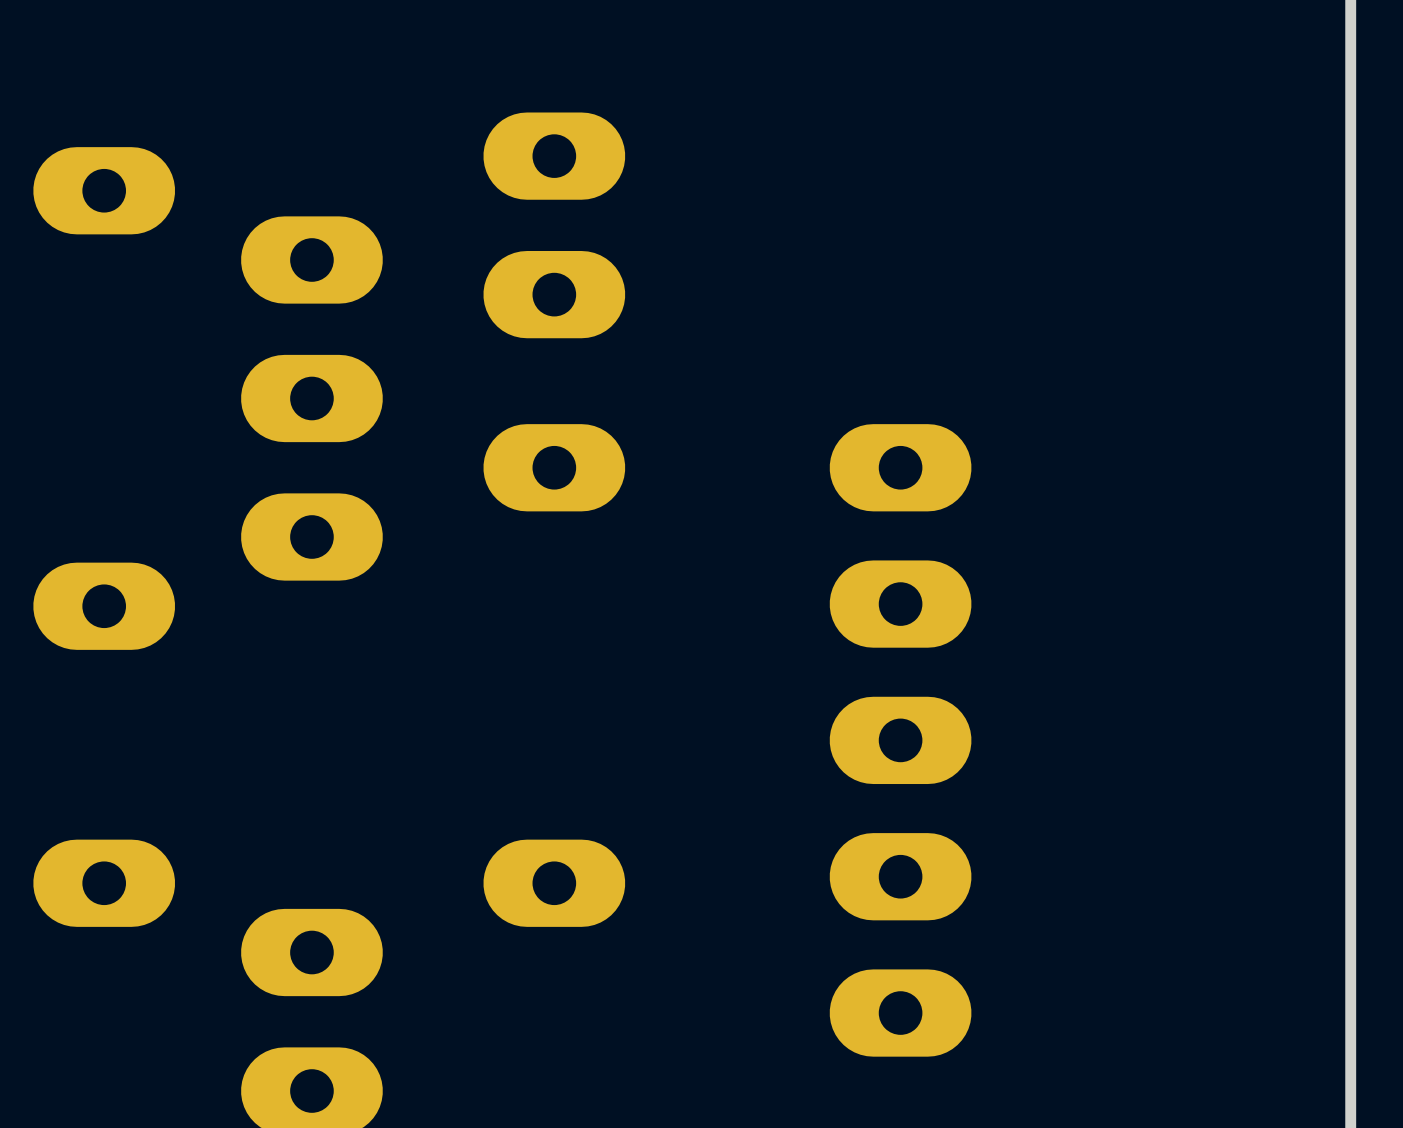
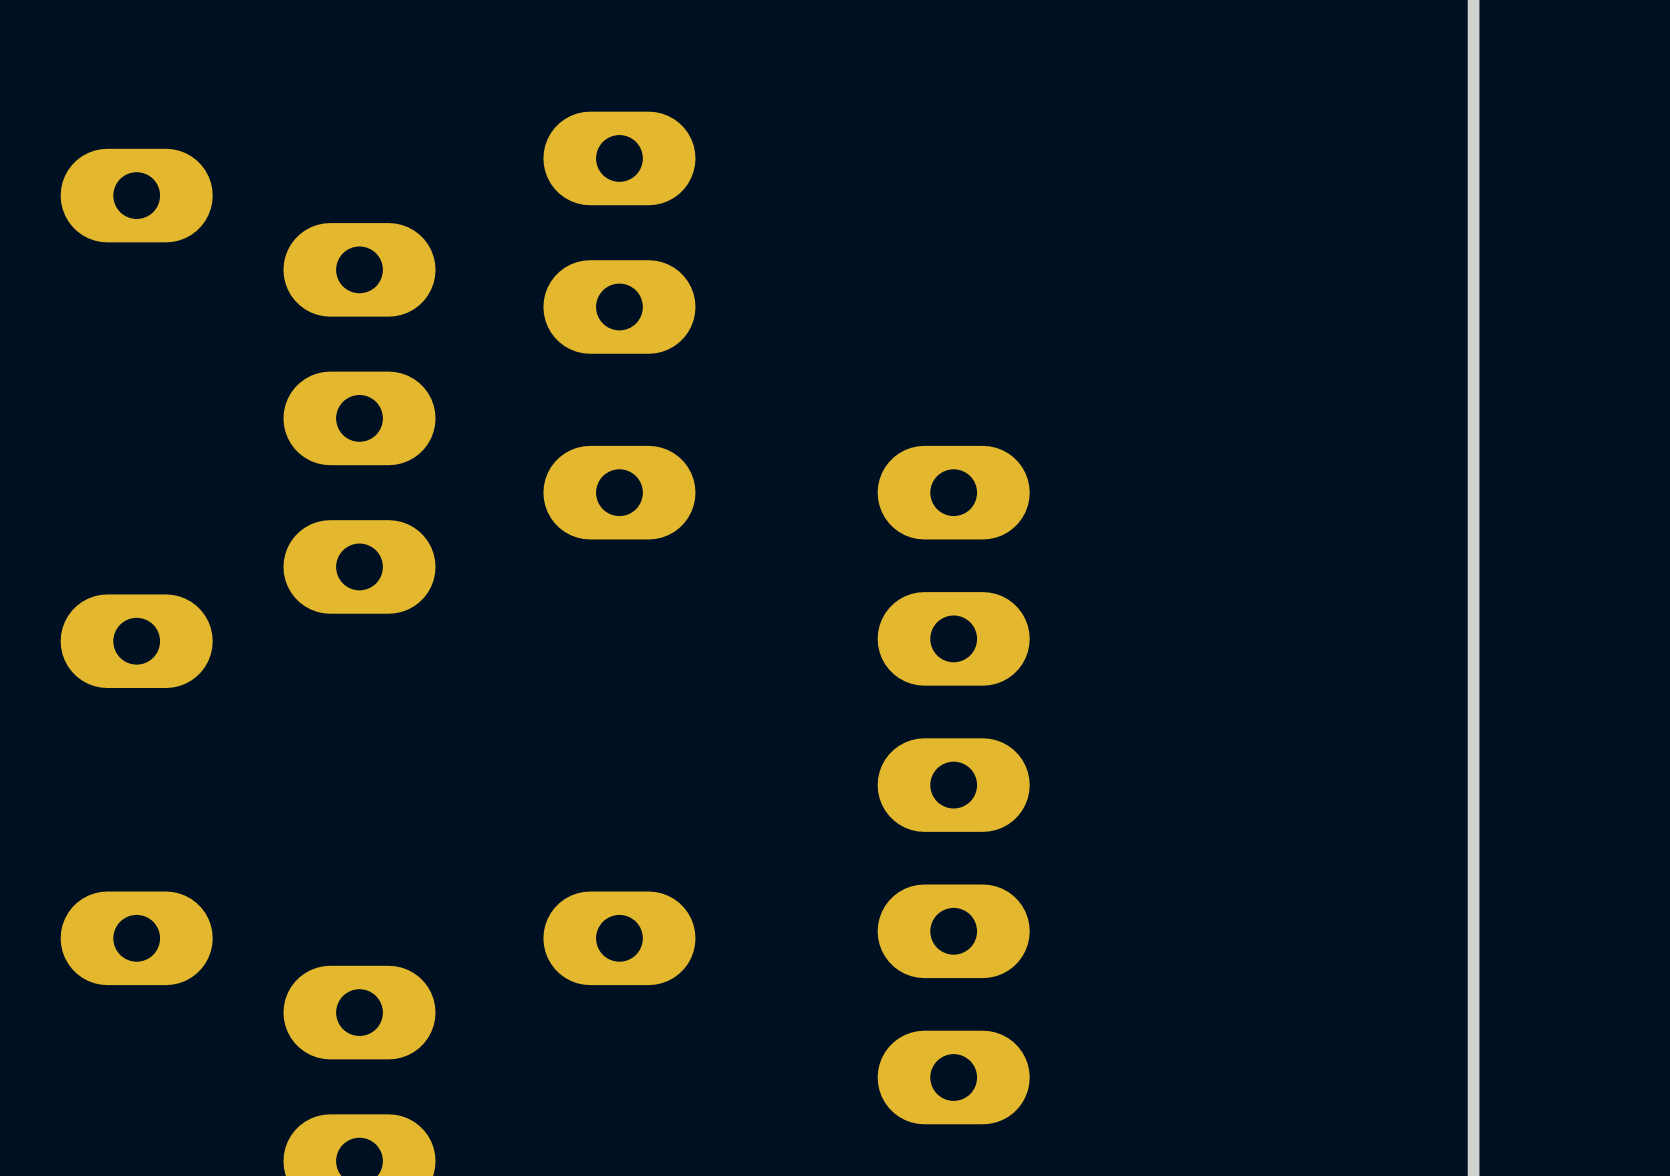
part position: (900, 740) -> (953, 785)

